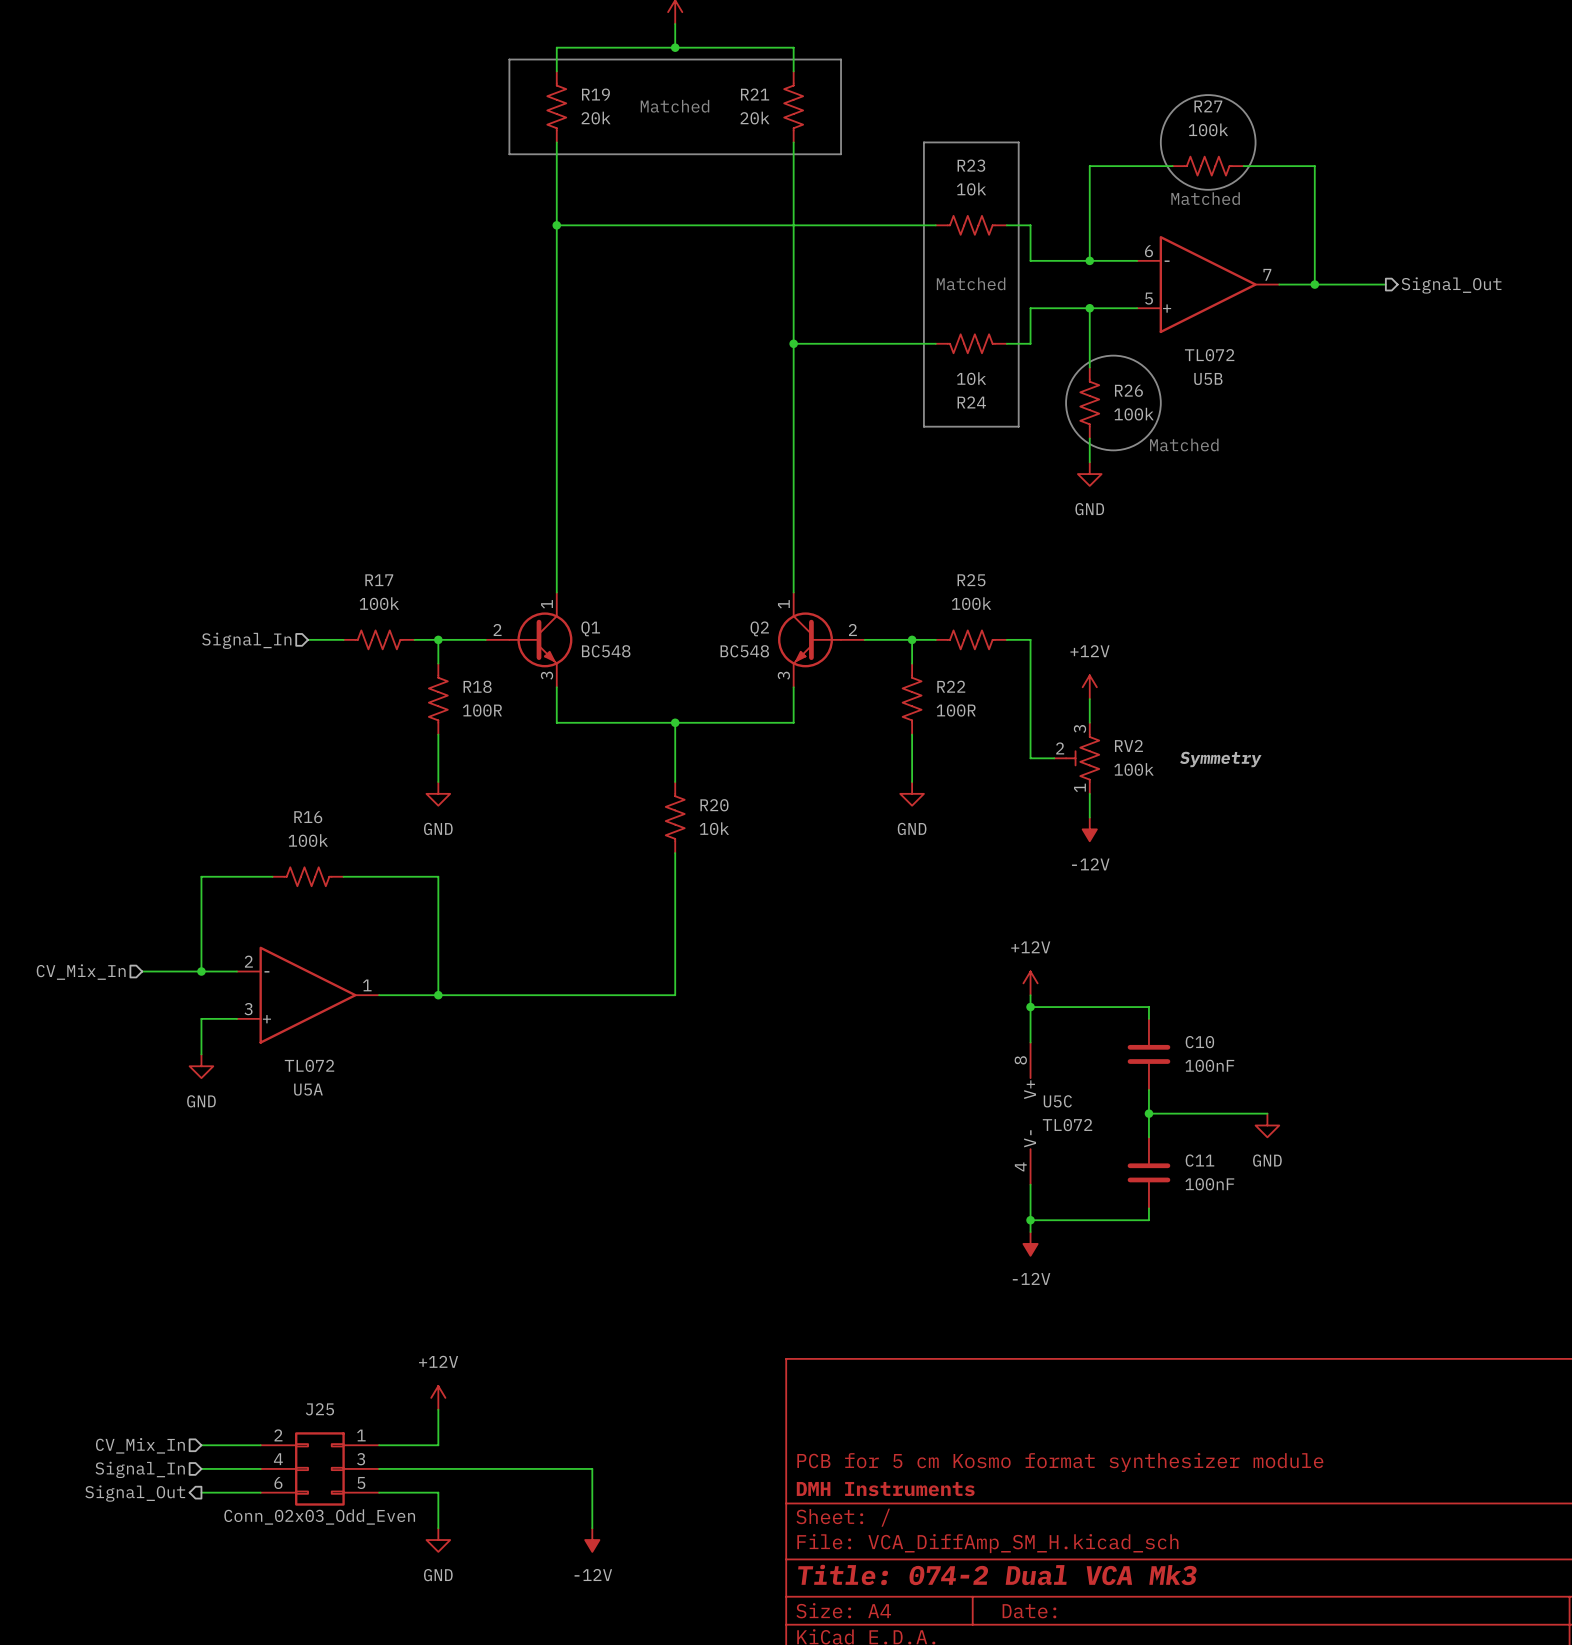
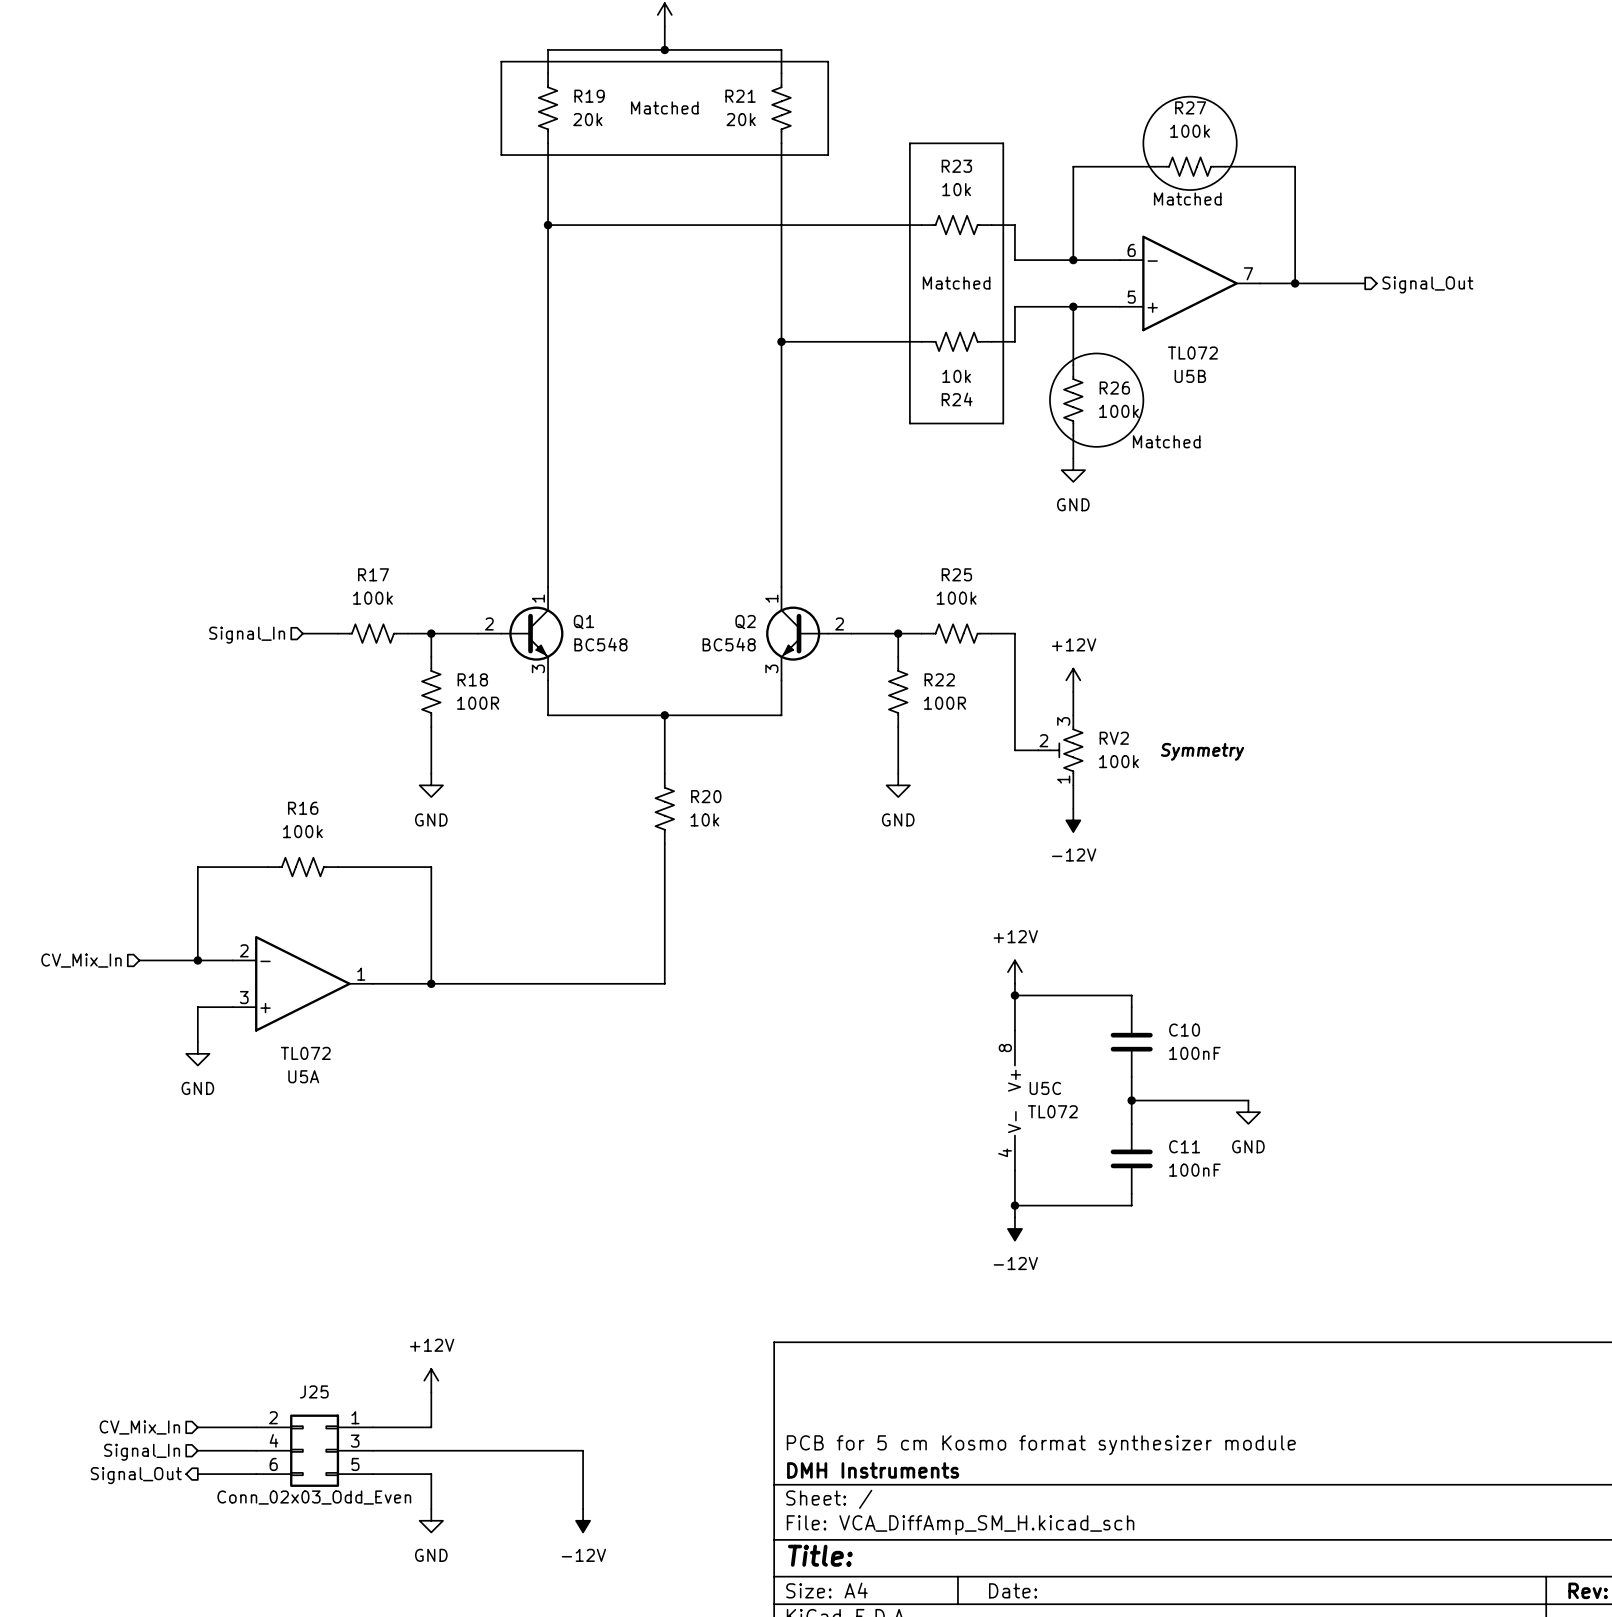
title block: Title: 074-2 Dual VCA Mk3 (997, 1574) -> Title: (820, 1555)

